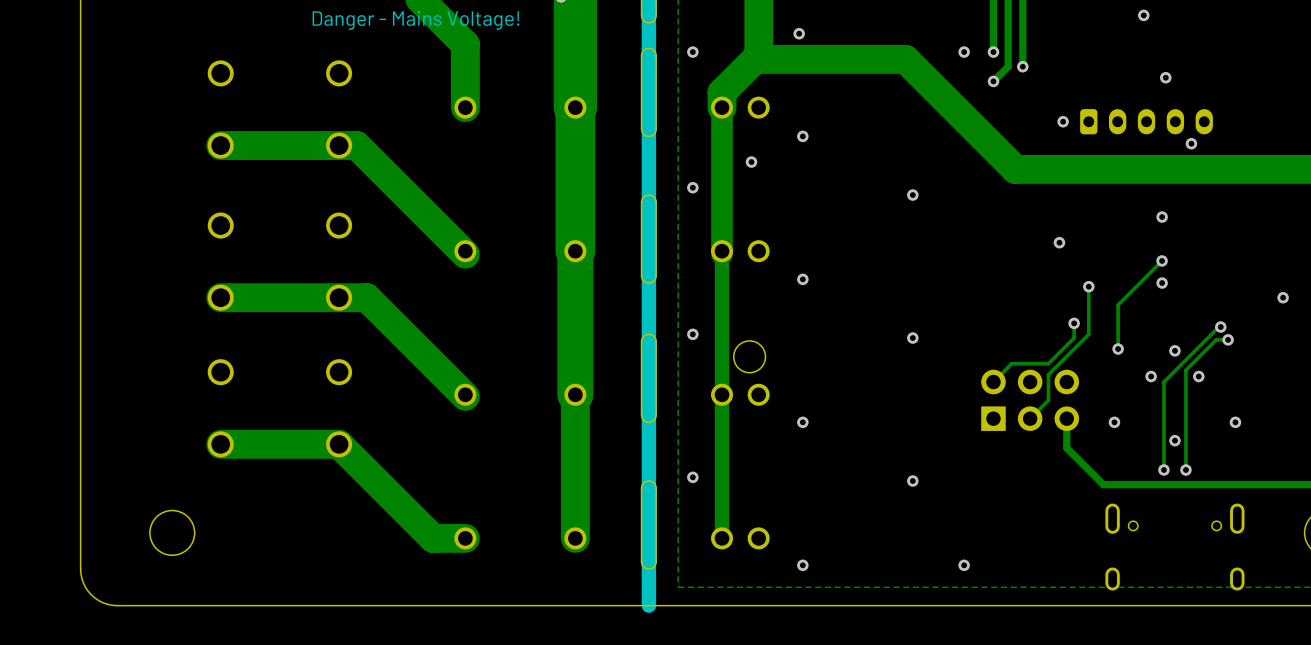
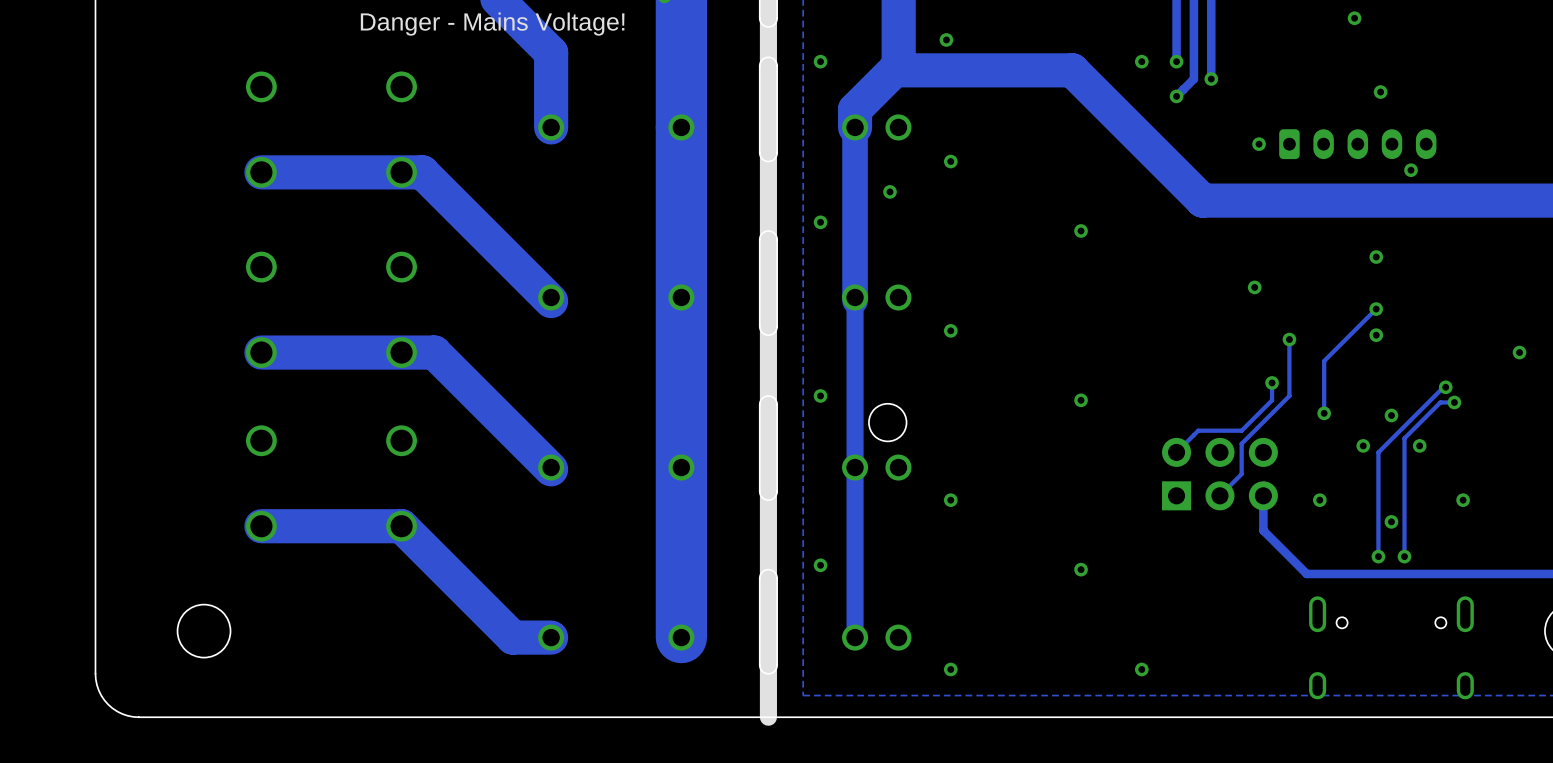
track width: thin (575, 107) (575, 538) -> thick (681, 127) (681, 637)

